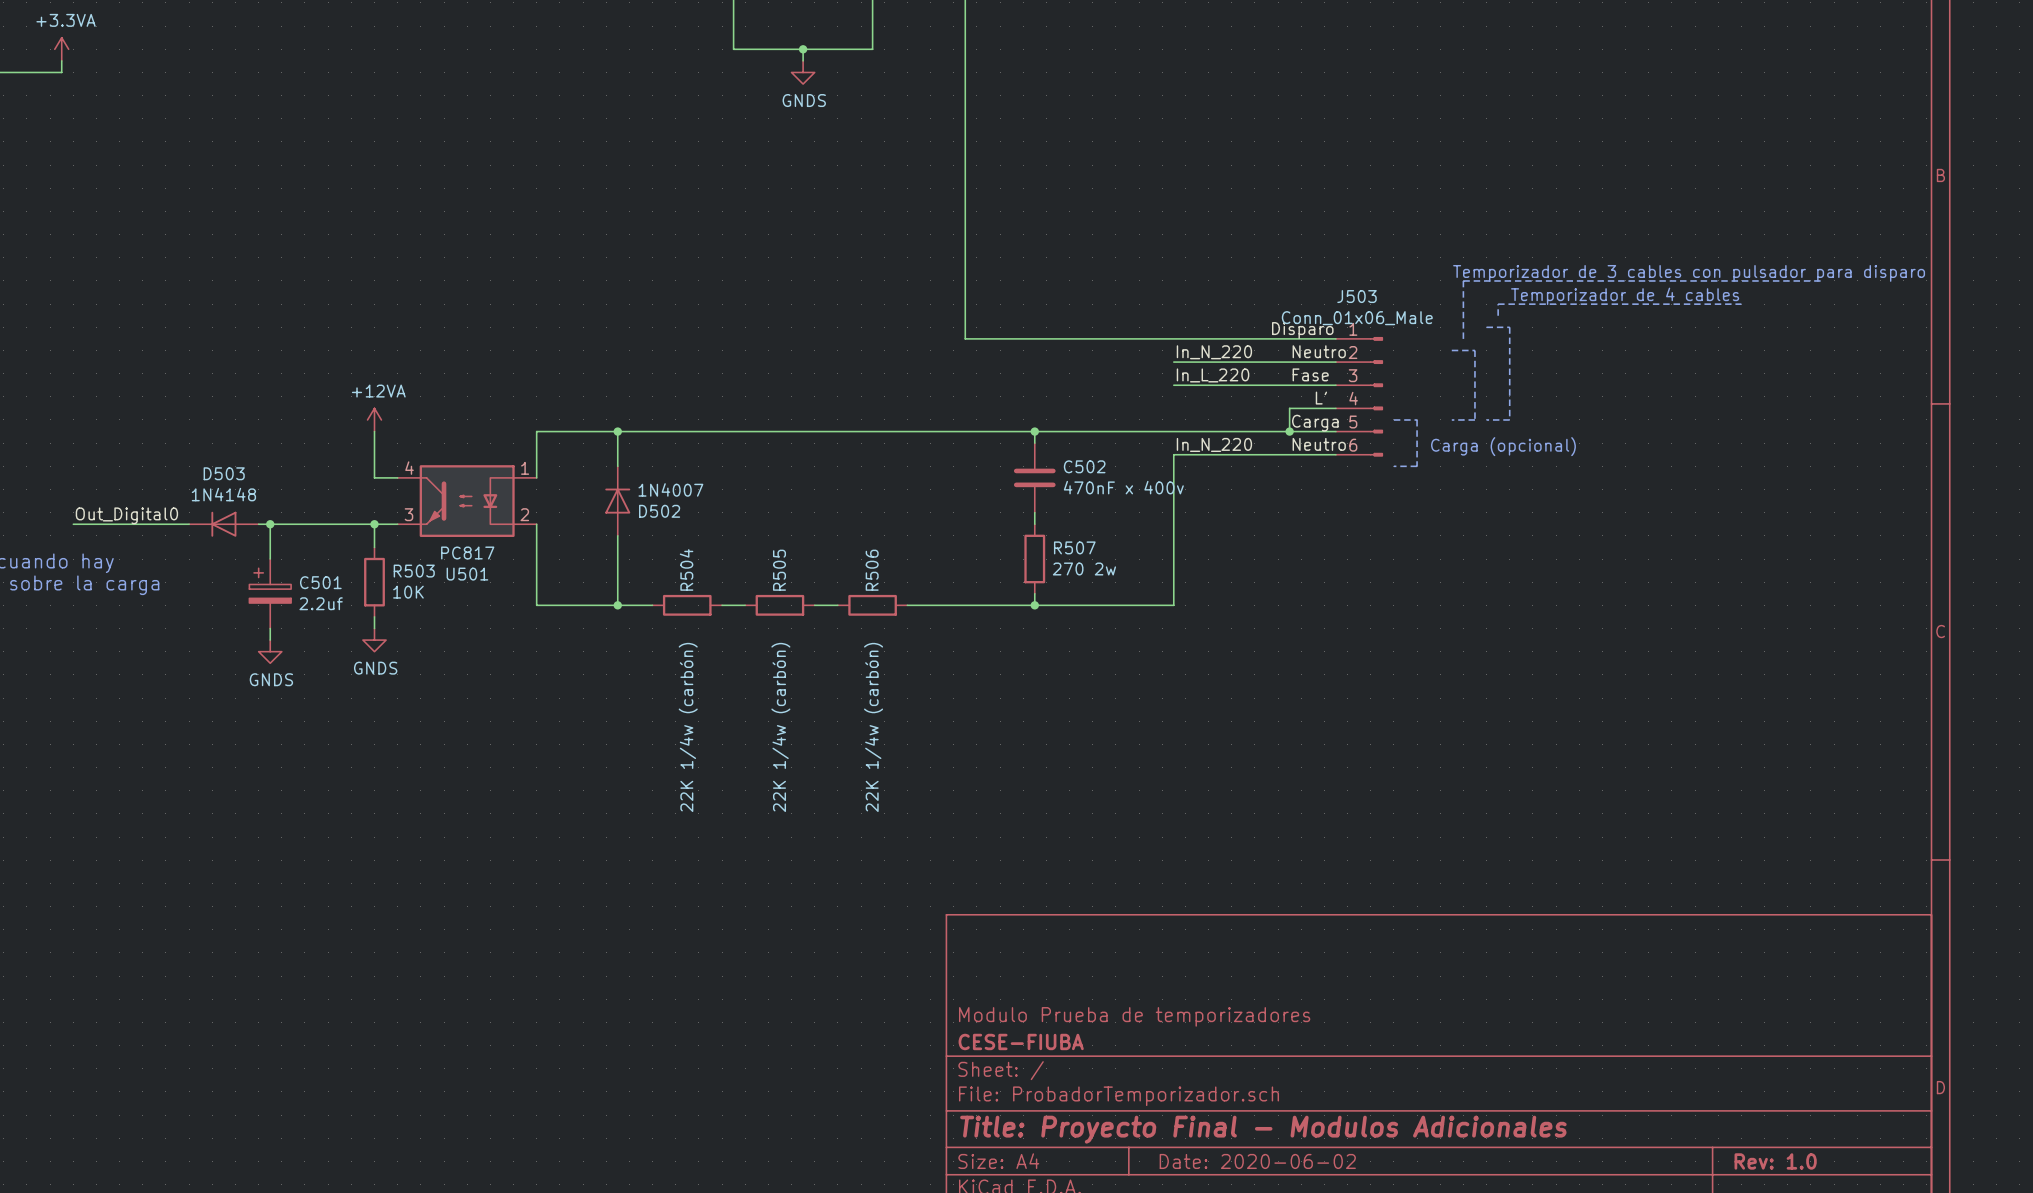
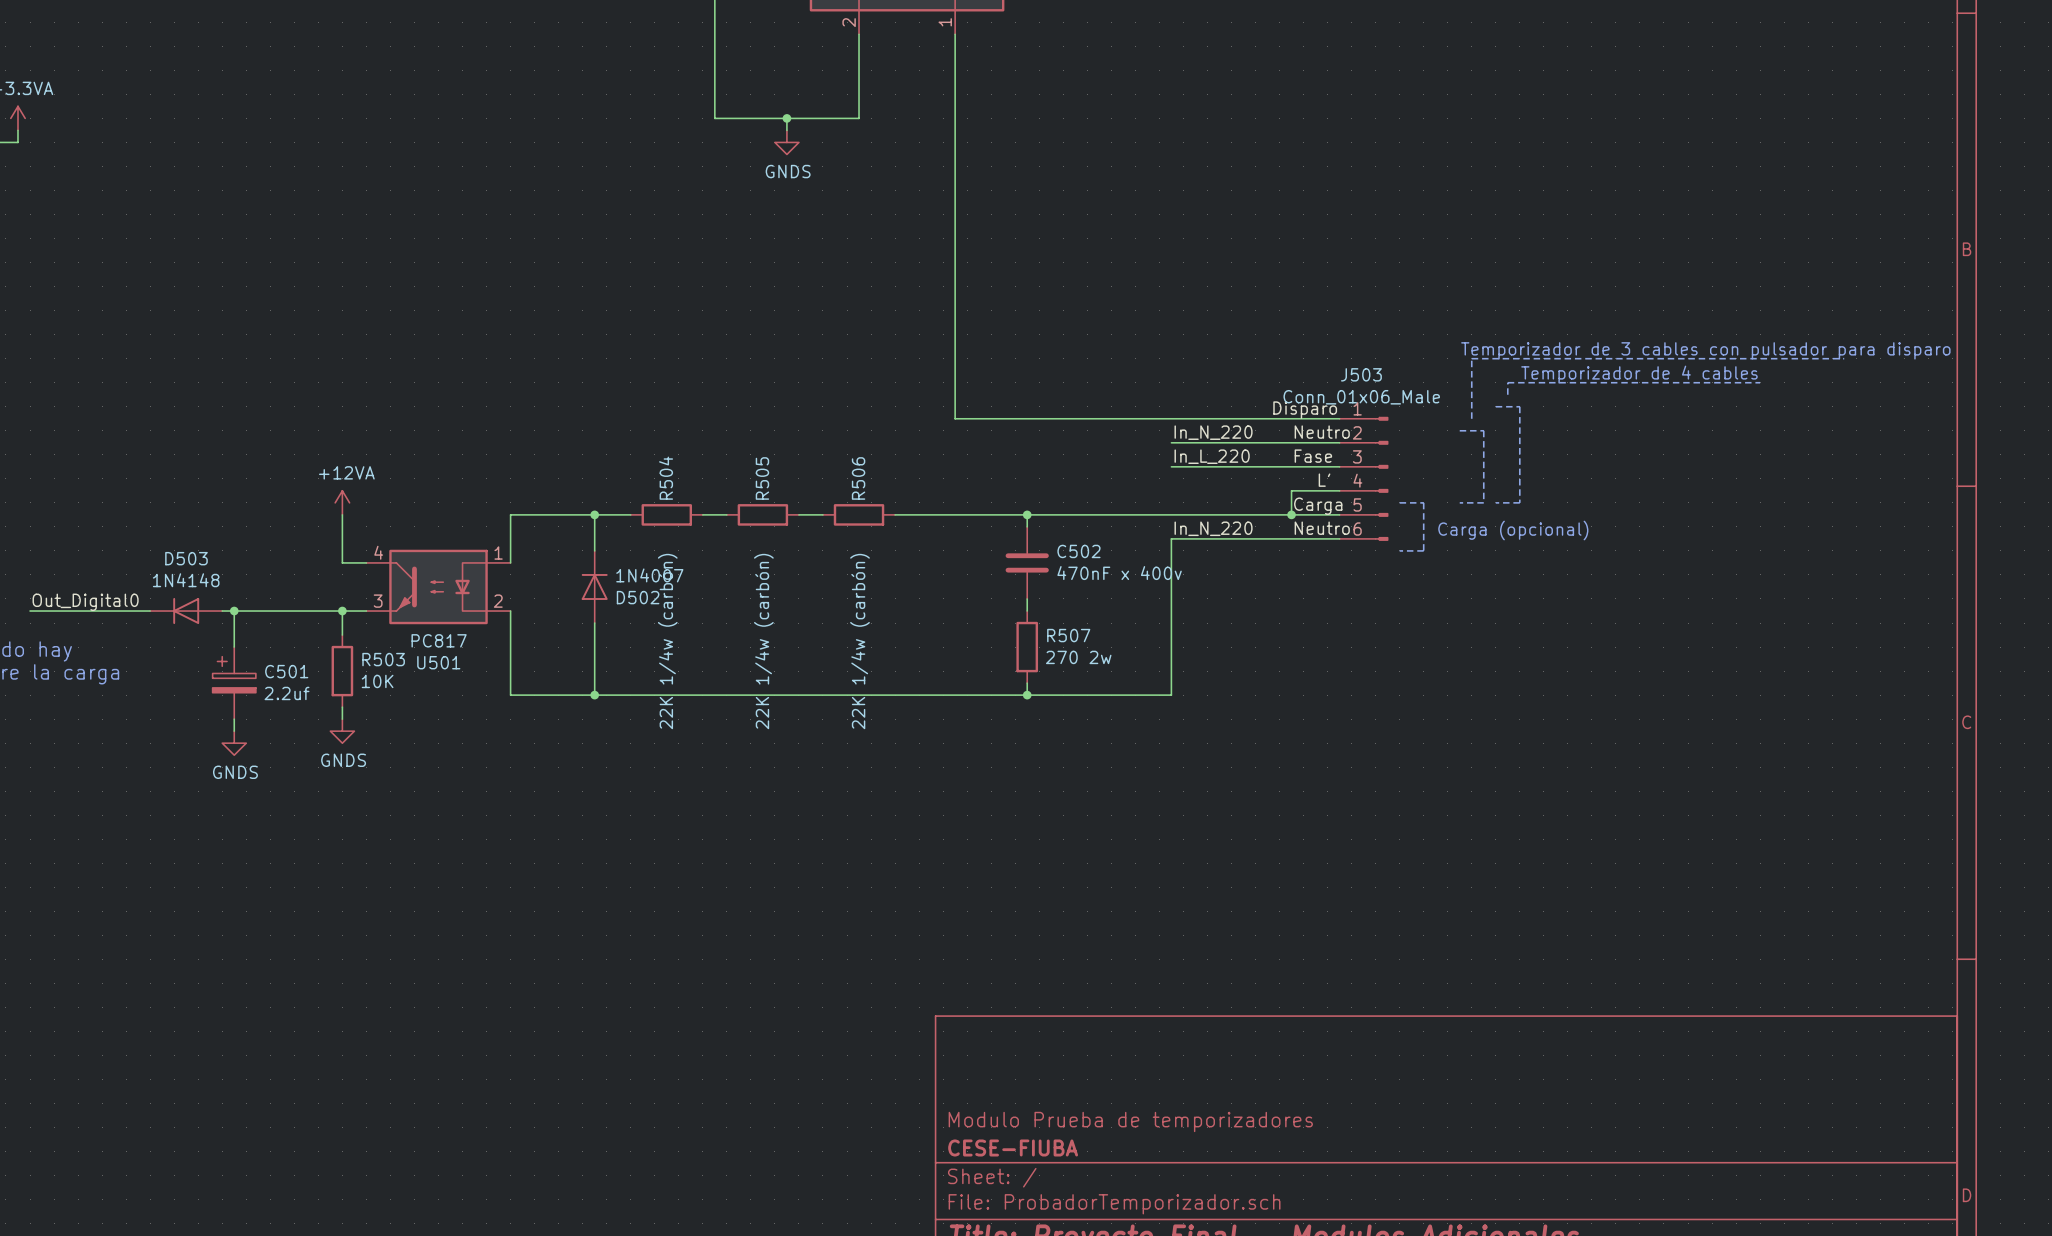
wire: (652, 431) (722, 431) -> (630, 695) (702, 695)
wire: (745, 431) (814, 431) -> (726, 695) (798, 695)
wire: (837, 431) (907, 431) -> (822, 695) (895, 695)
R504 position: (687, 605) -> (666, 514)
R505 position: (779, 605) -> (762, 514)
R506 position: (872, 605) -> (859, 514)

